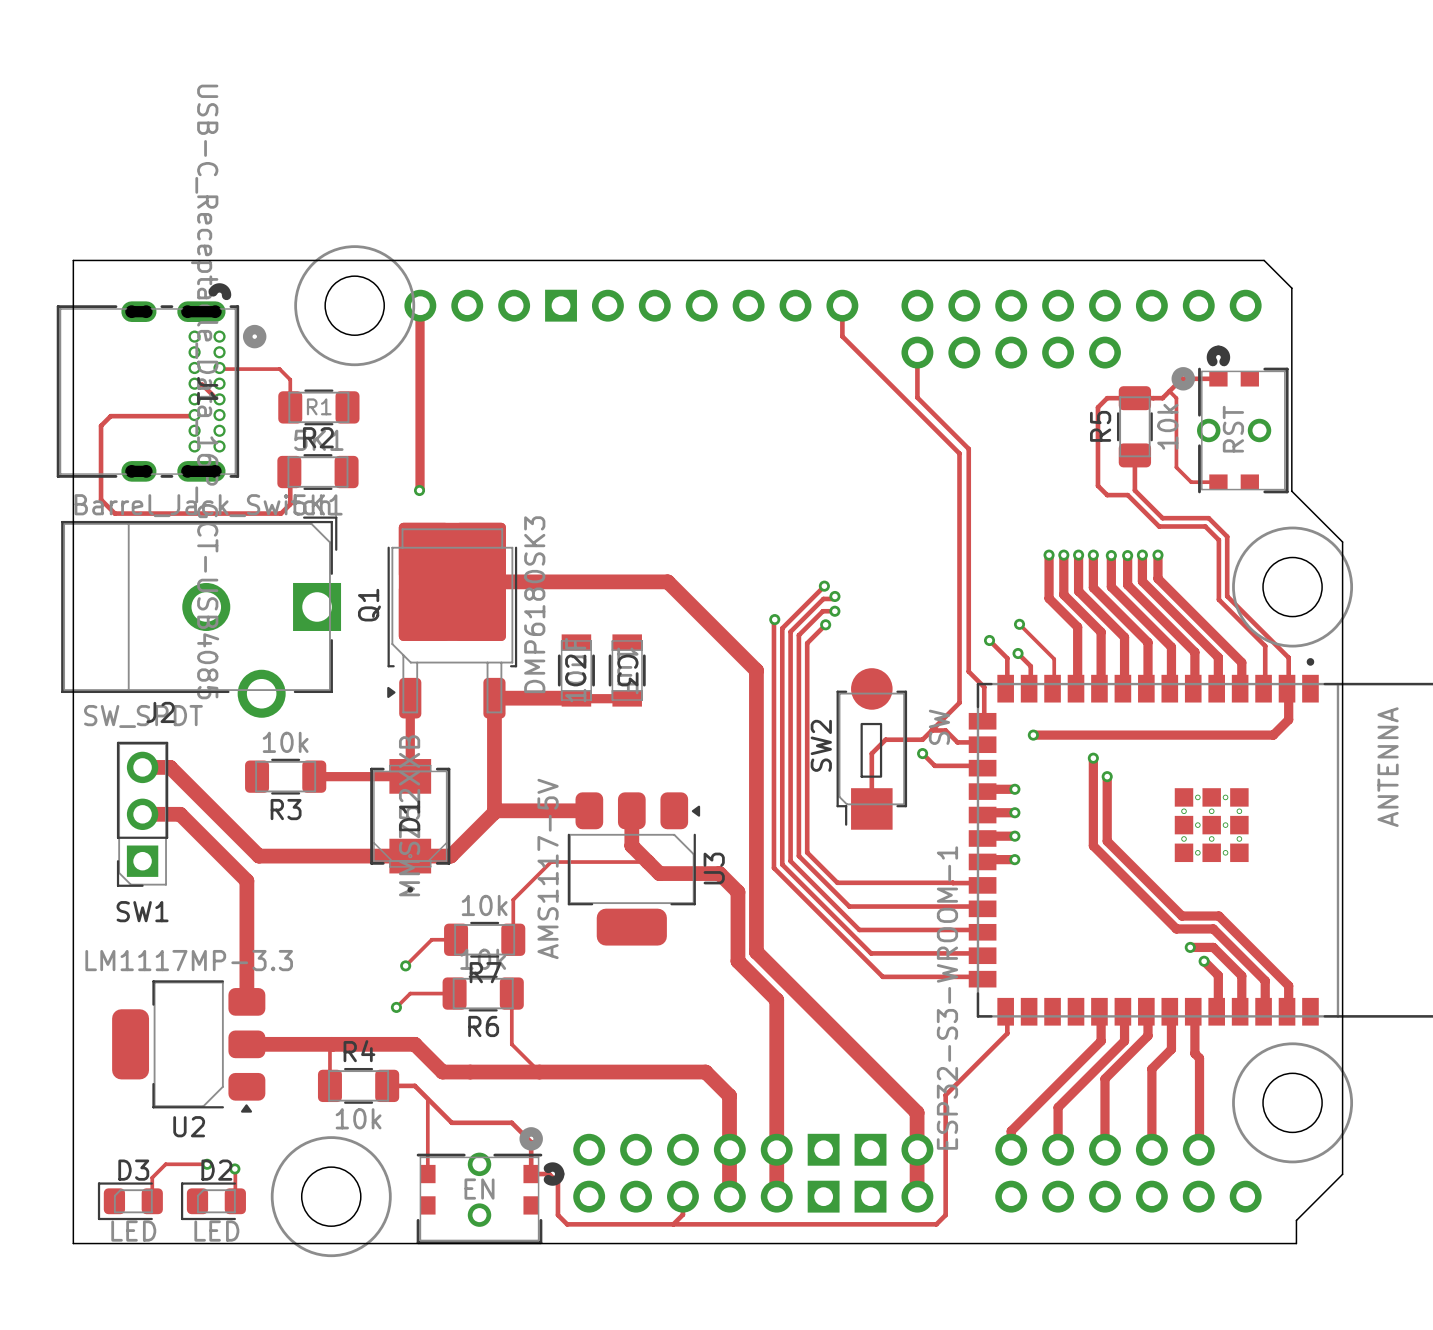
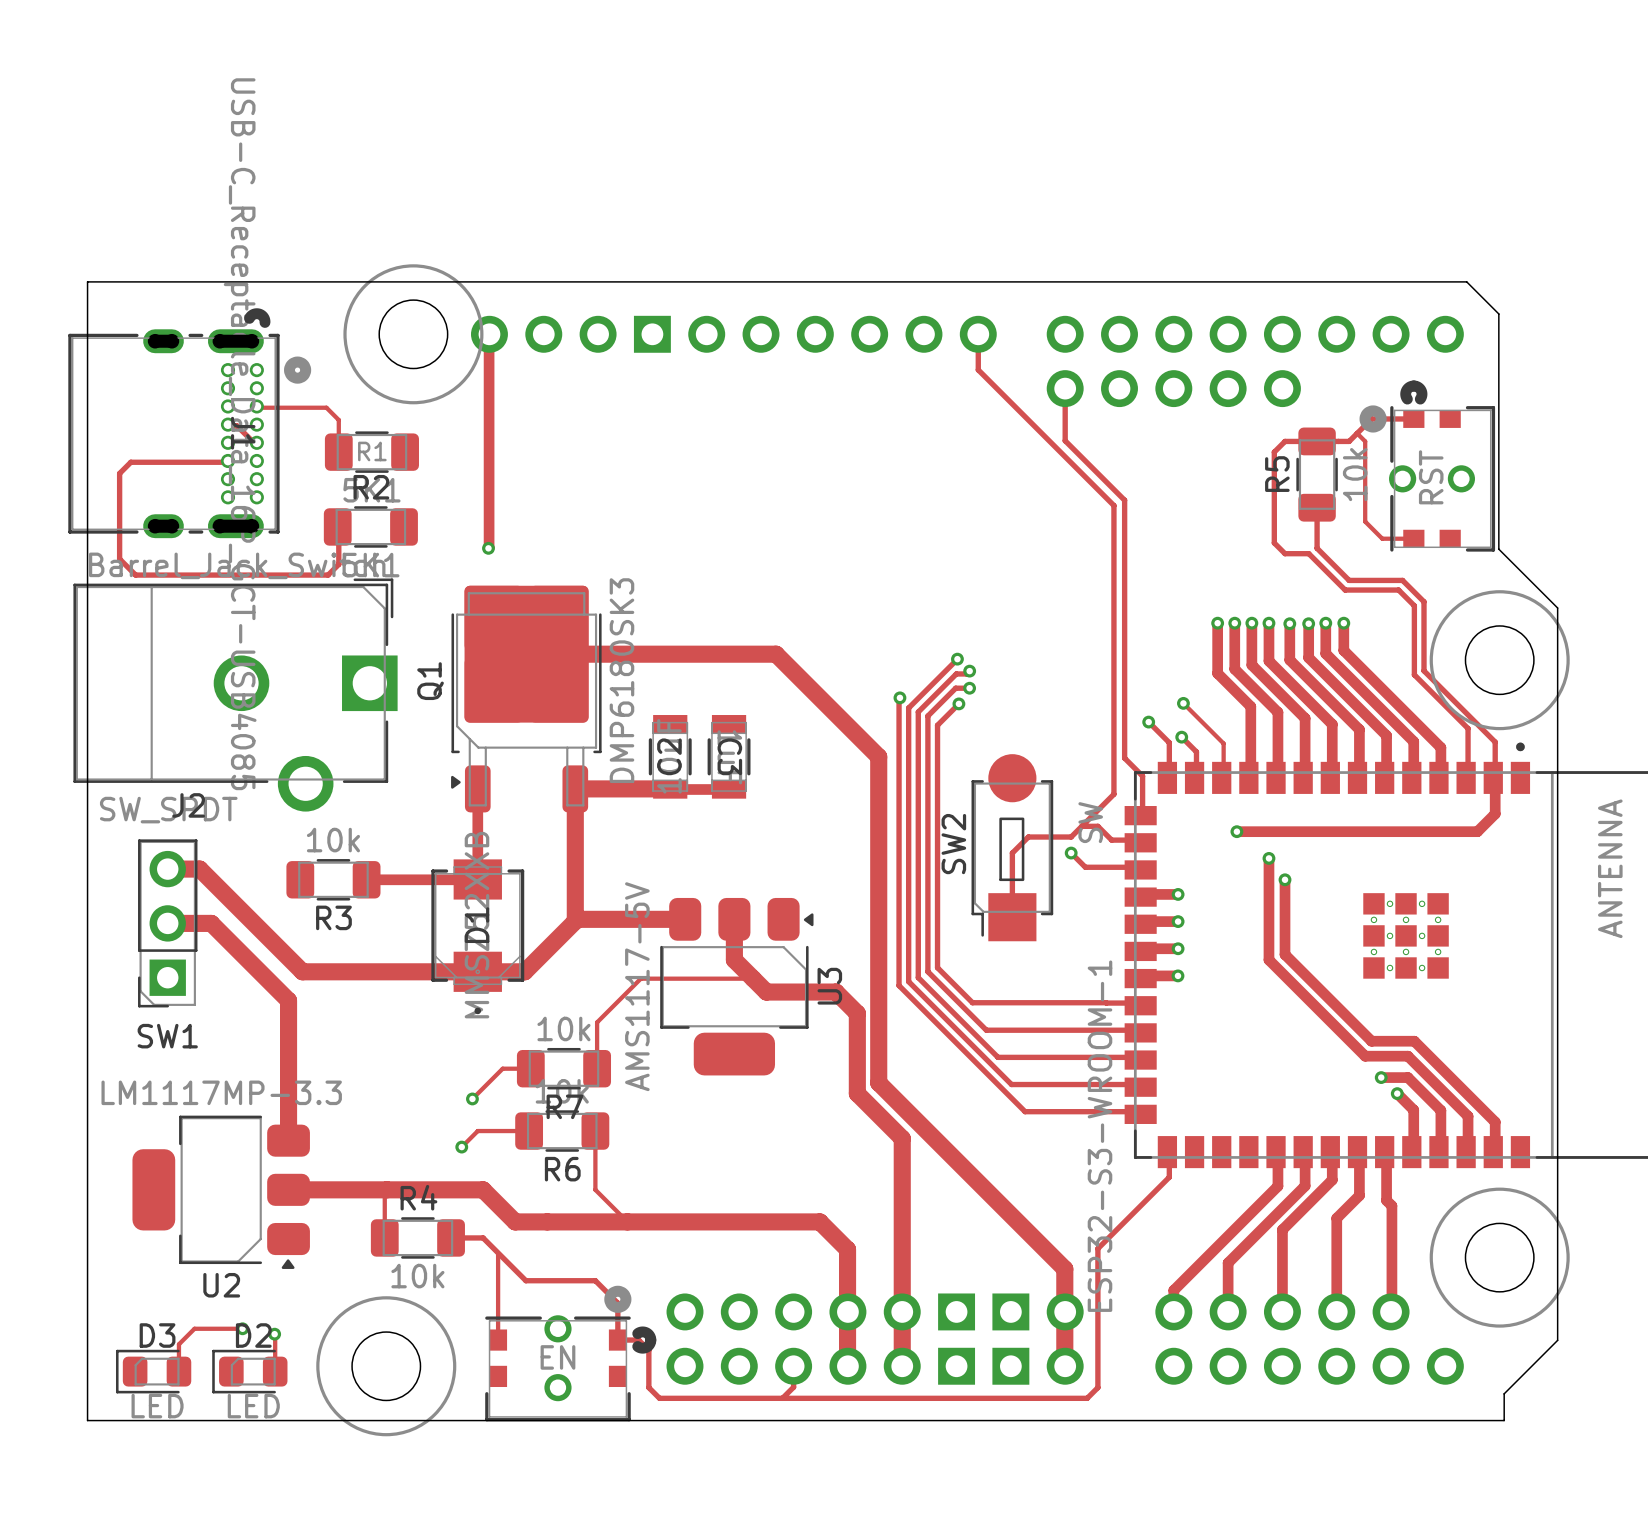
track: (1033, 735) (1065, 735) -> none
via position: (1033, 735) -> (1236, 831)

